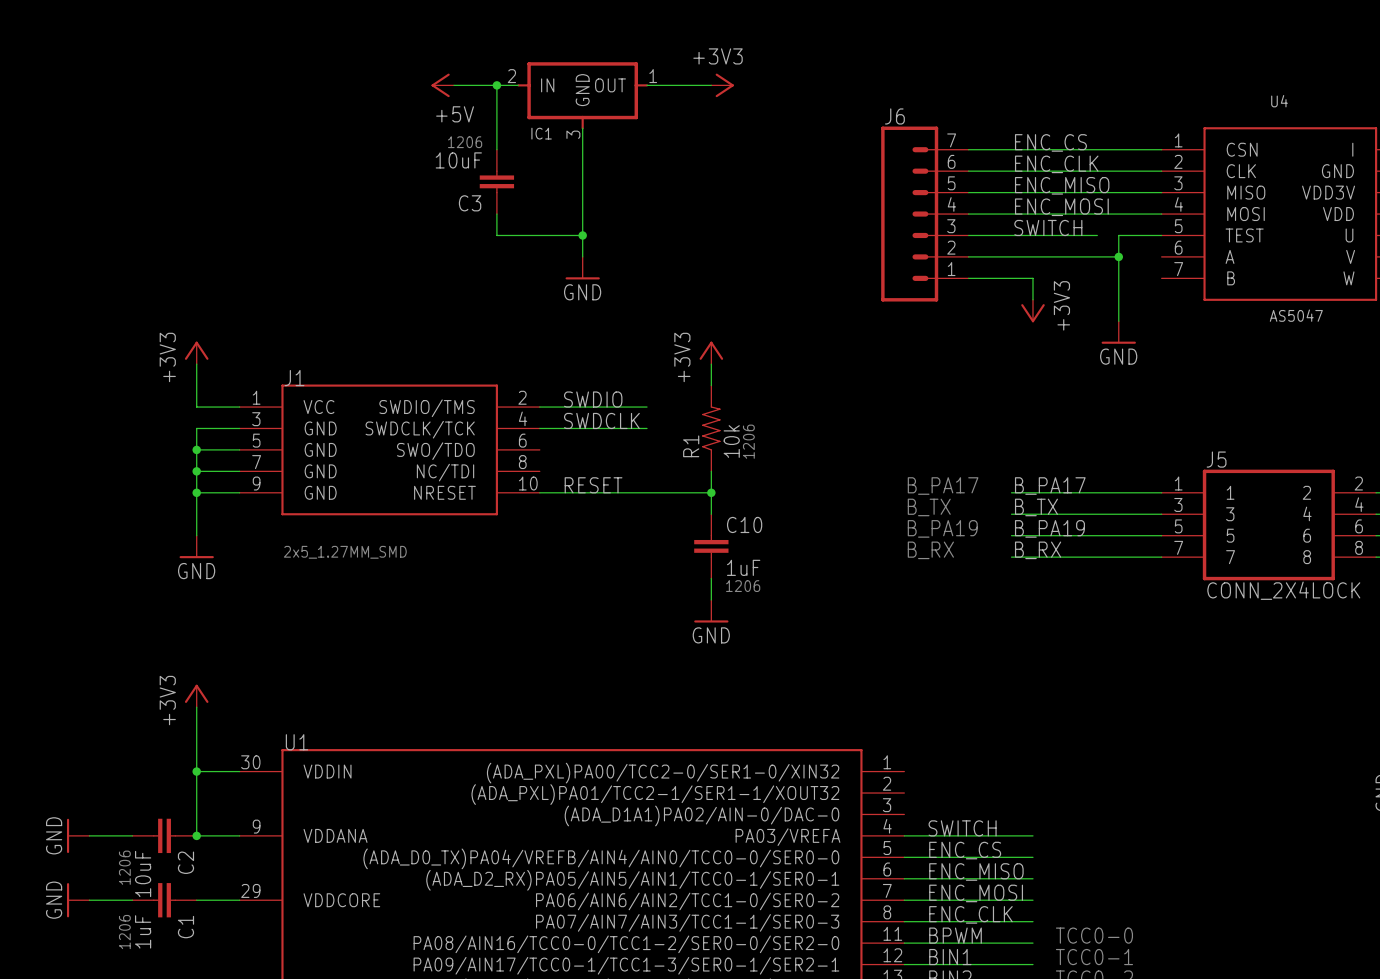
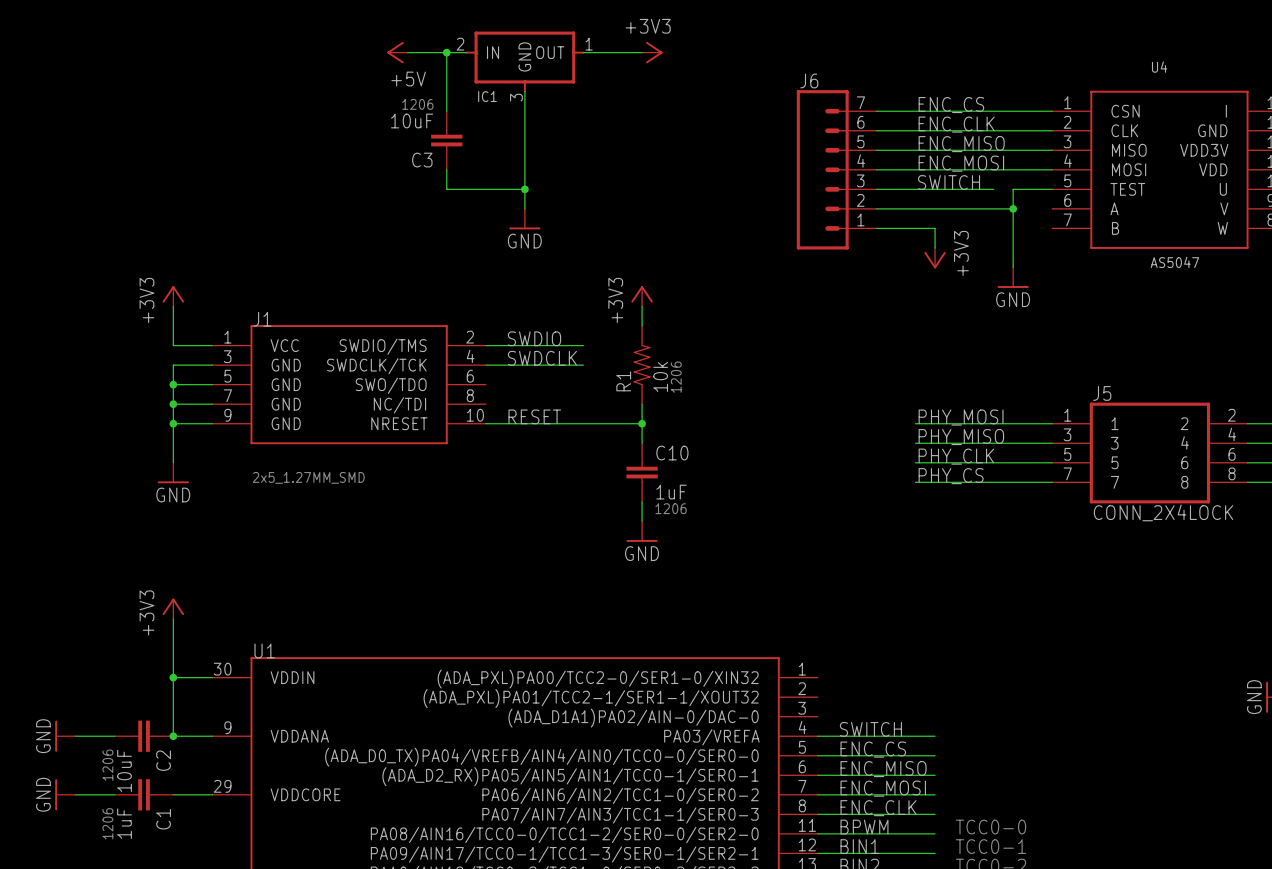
text: B_PA17 (943, 486) -> none
label: B_PA17 (1050, 486) -> PHY_MOSI (961, 417)
text: B_TX (929, 507) -> none
label: B_TX (1036, 507) -> PHY_MISO (961, 437)
text: B_PA19 (942, 528) -> none
label: B_PA19 (1049, 528) -> PHY_CLK (956, 456)
text: B_RX (930, 550) -> none
label: B_RX (1038, 550) -> PHY_CS (951, 476)

